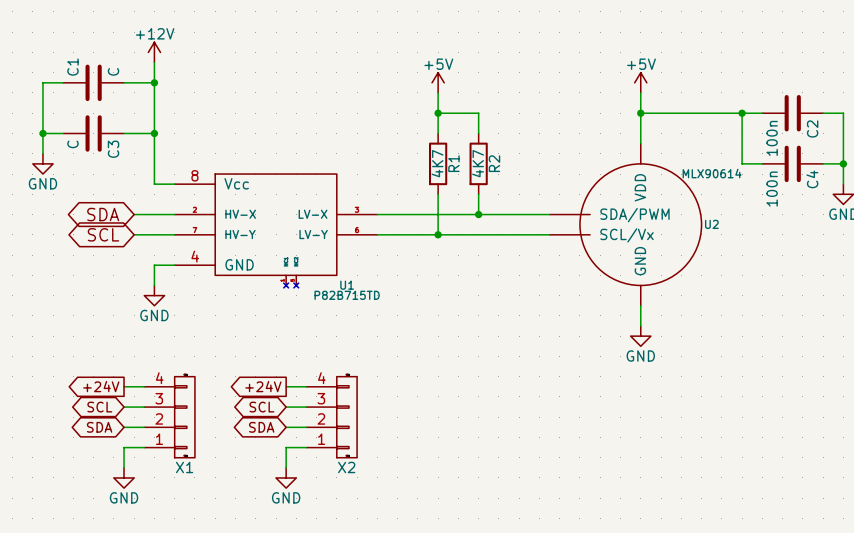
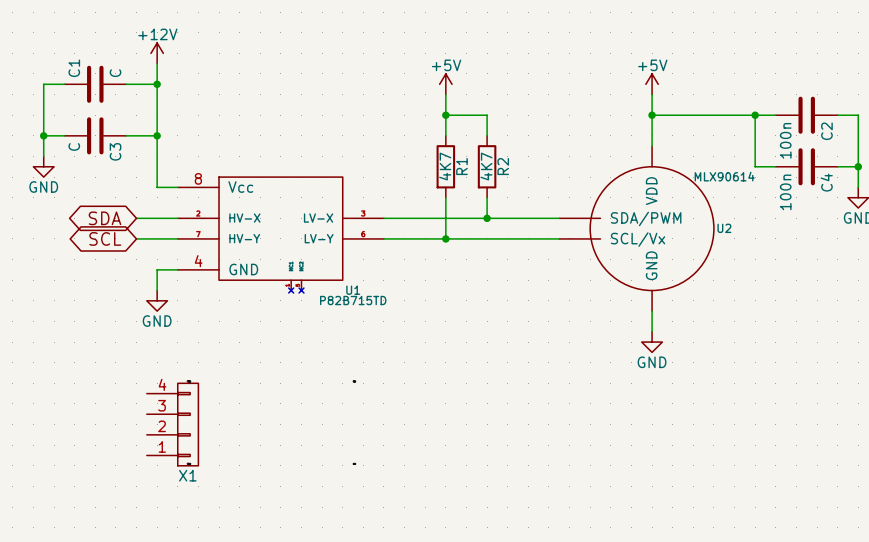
global label: +24V (101, 386) -> none
wire: (124, 386) (144, 386) -> none
global label: +24V (263, 386) -> none
wire: (286, 386) (306, 386) -> none
global label: SCL (99, 407) -> none
wire: (124, 407) (144, 407) -> none
global label: SCL (261, 407) -> none
wire: (286, 407) (306, 407) -> none
X2: (331, 417) -> none
global label: SDA (99, 427) -> none
wire: (124, 427) (144, 427) -> none
global label: SDA (261, 427) -> none
wire: (286, 427) (306, 427) -> none
wire: (144, 447) (124, 447) (124, 467) -> none
wire: (306, 447) (286, 447) (286, 467) -> none
power symbol: GND (124, 477) -> none
power symbol: GND (286, 477) -> none

